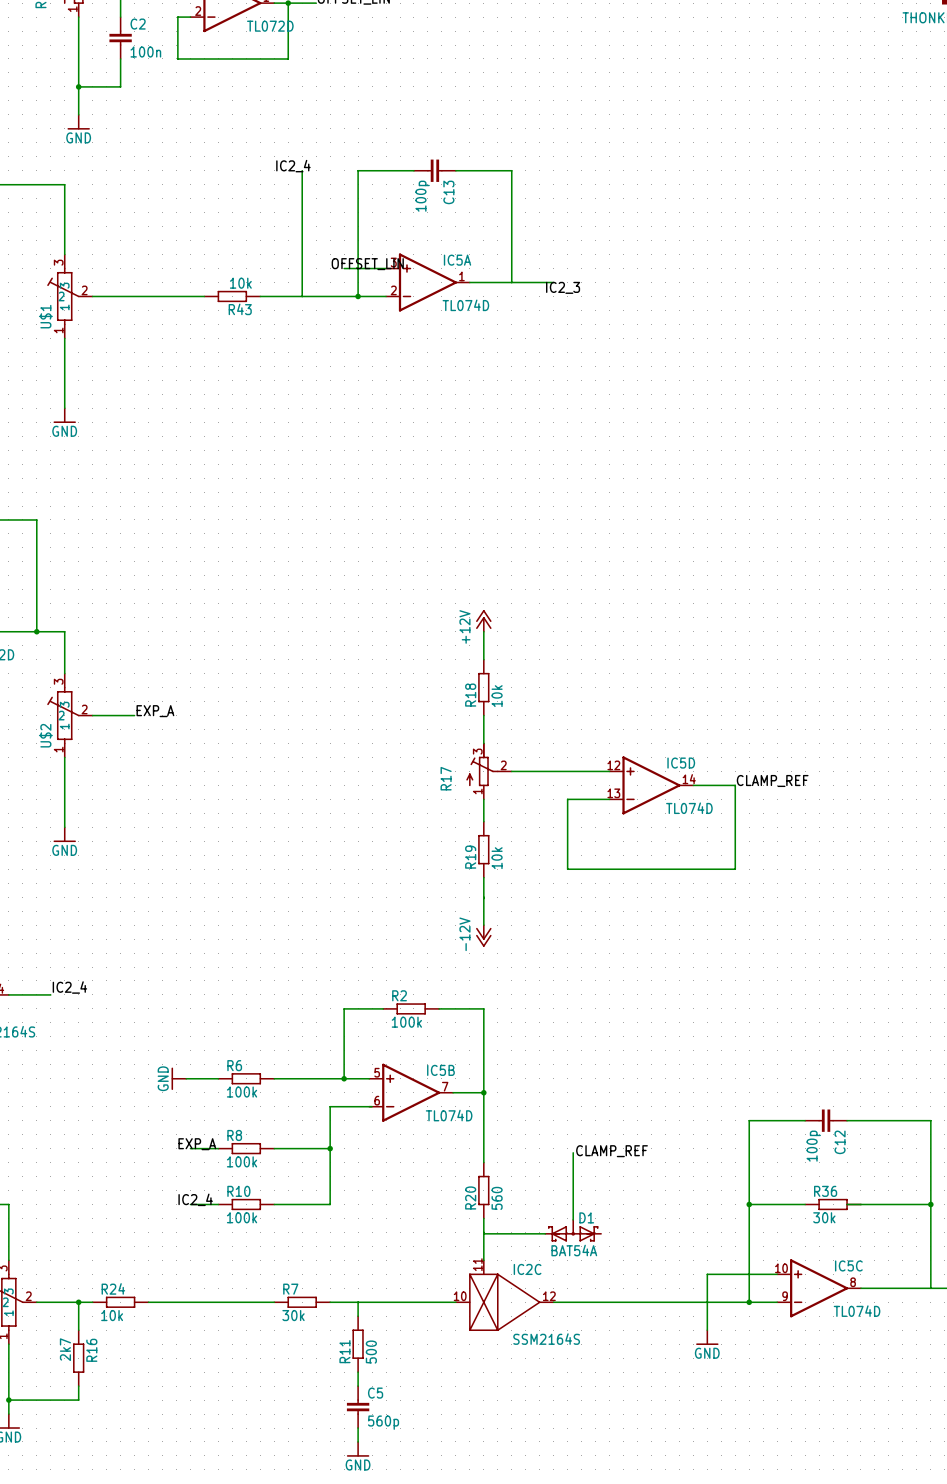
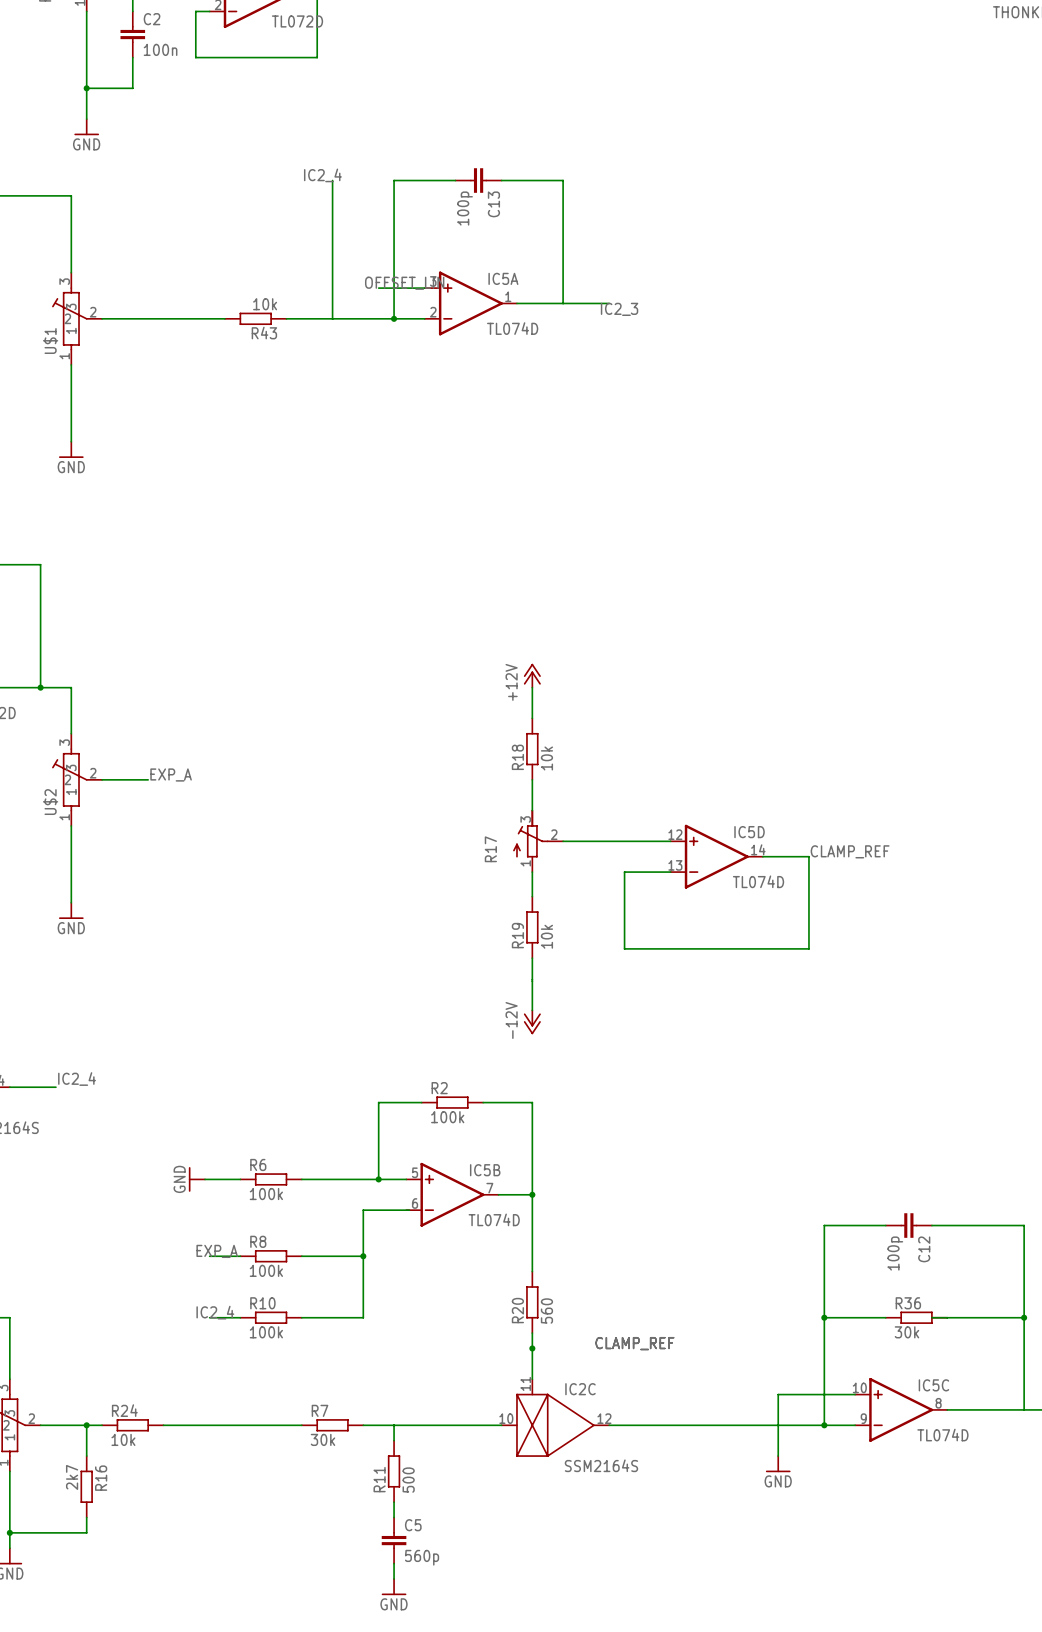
label position: CLAMP_REF (612, 1151) -> CLAMP_REF (634, 1343)
wire: (573, 1152) (573, 1219) -> none
D1: BAT54A (573, 1230) -> none
junction: none -> (532, 1348)
wire: (483, 1233) (545, 1233) -> none

